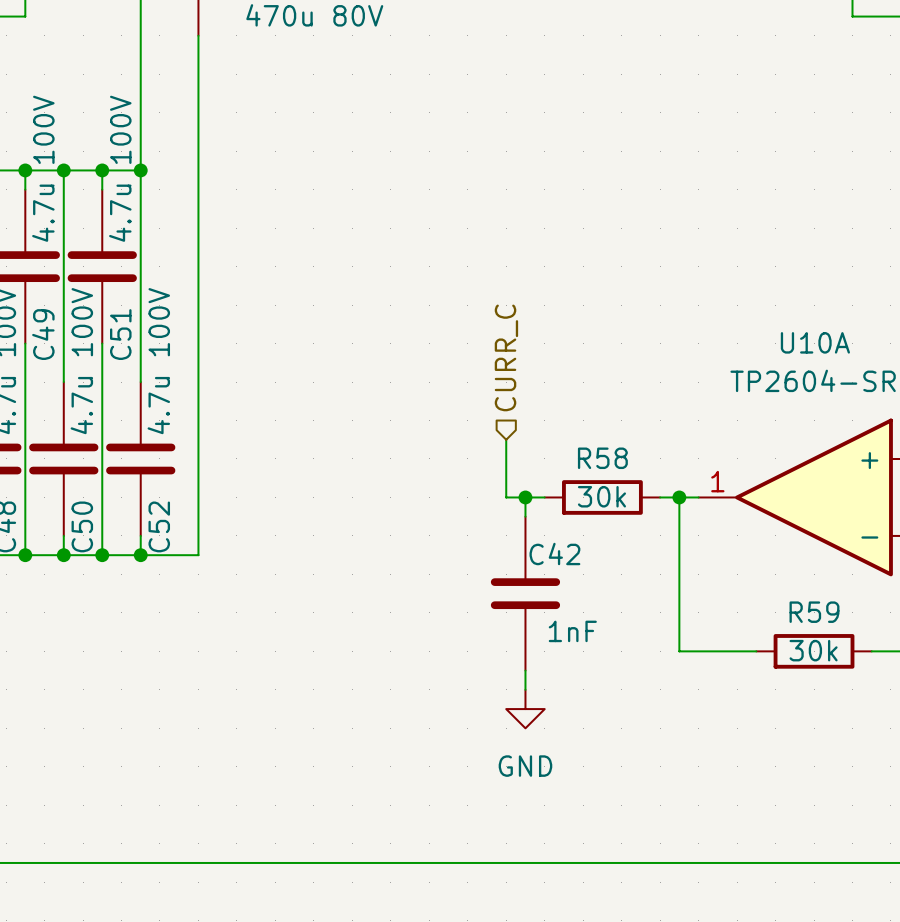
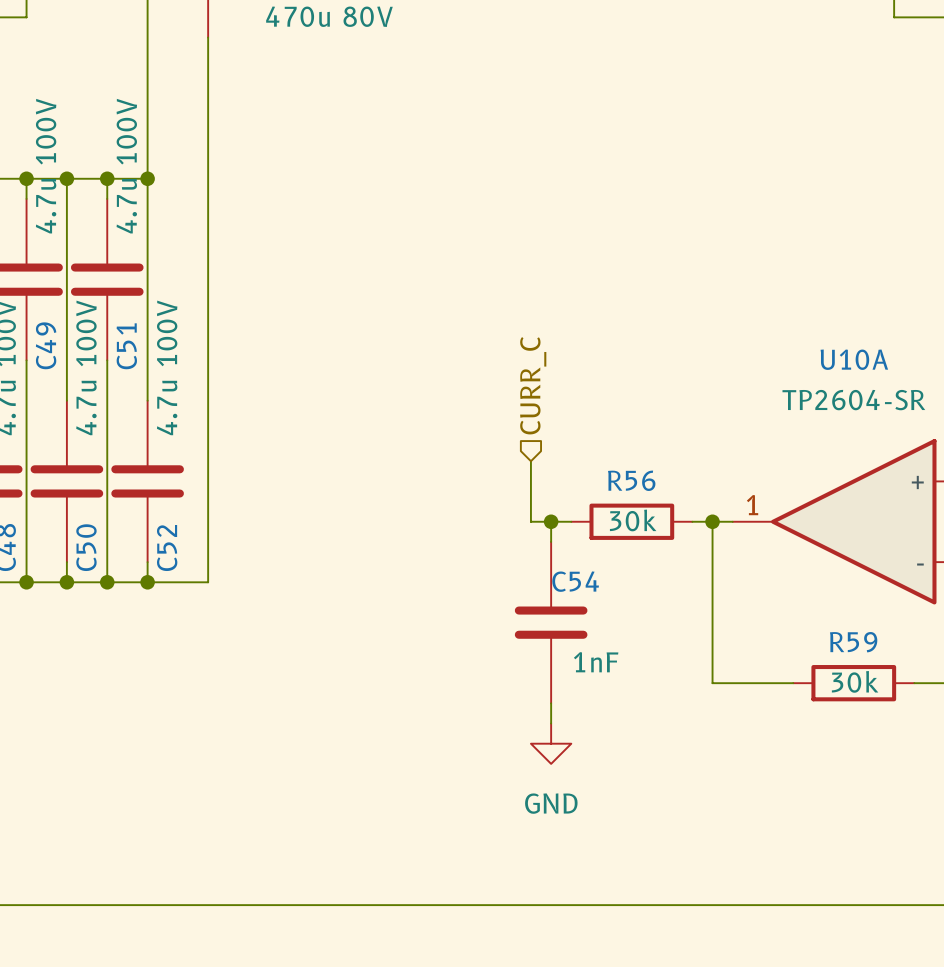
R58 name: R58 (602, 458) -> R56 (631, 480)
C42 name: C42 (554, 554) -> C54 (575, 581)

